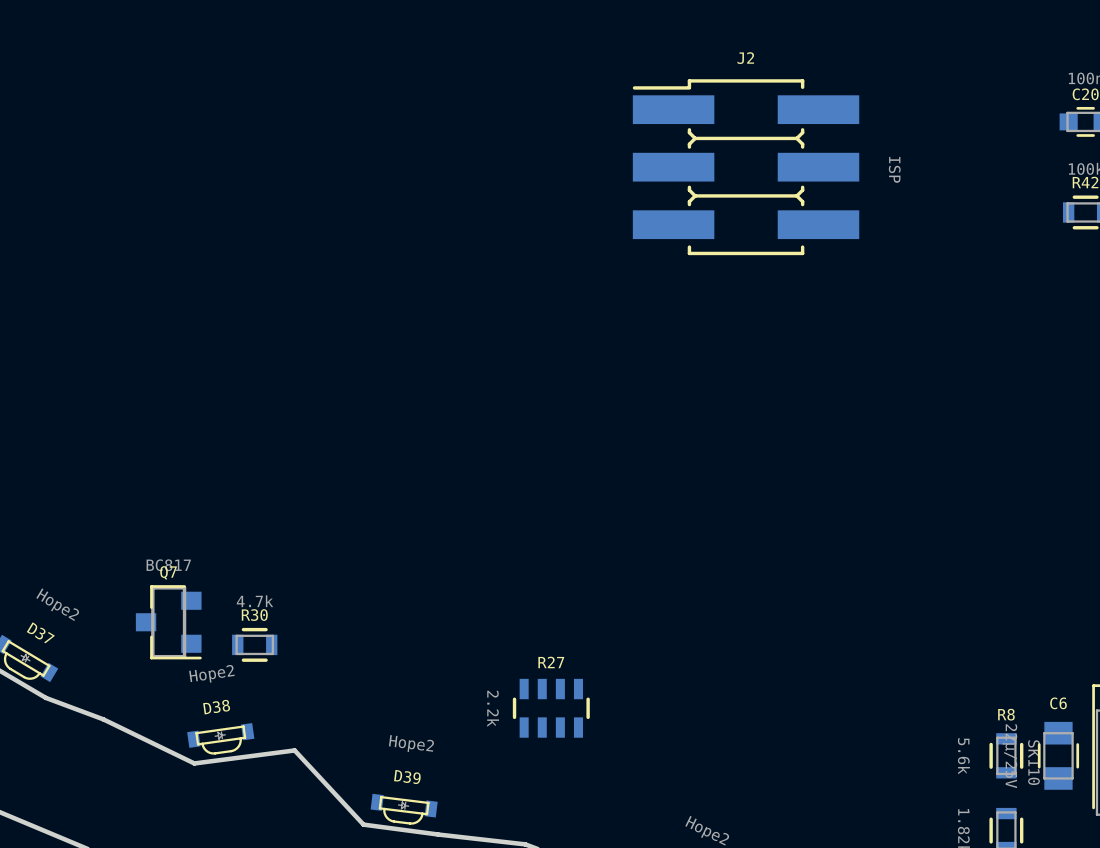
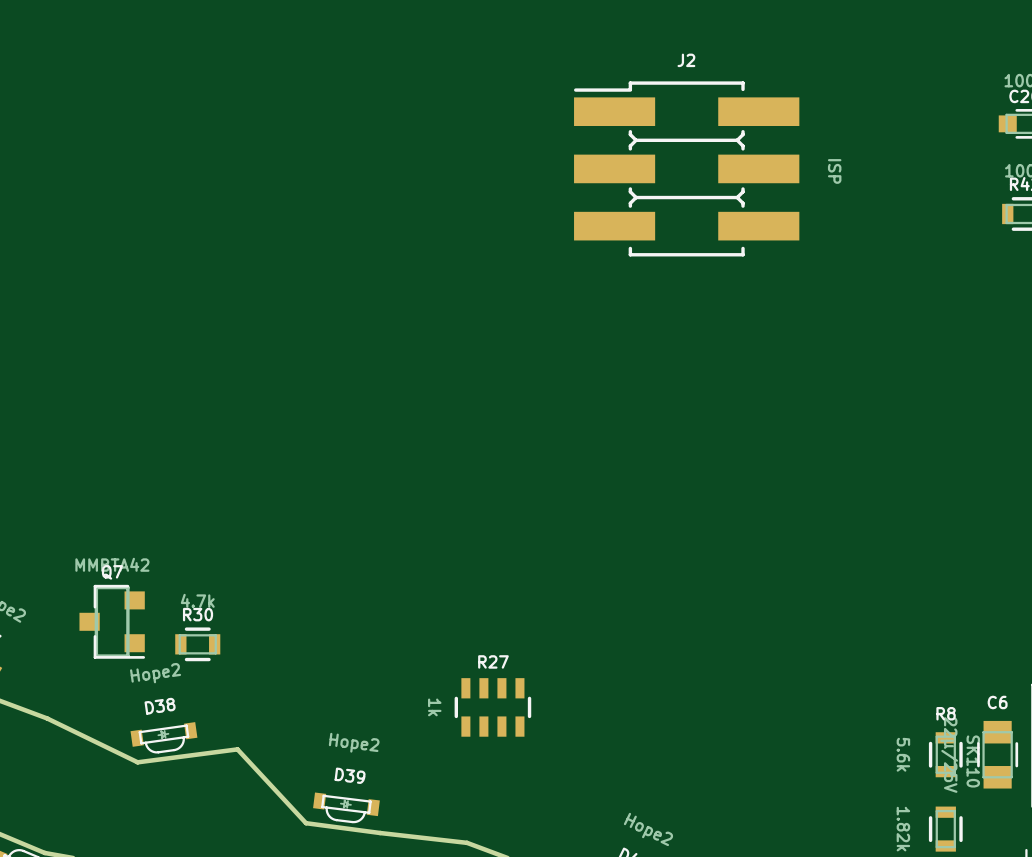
Q7 value: BC817 (168, 565) -> MMBTA42 (112, 564)
R27 value: 2.2k (493, 708) -> 1k (434, 707)

